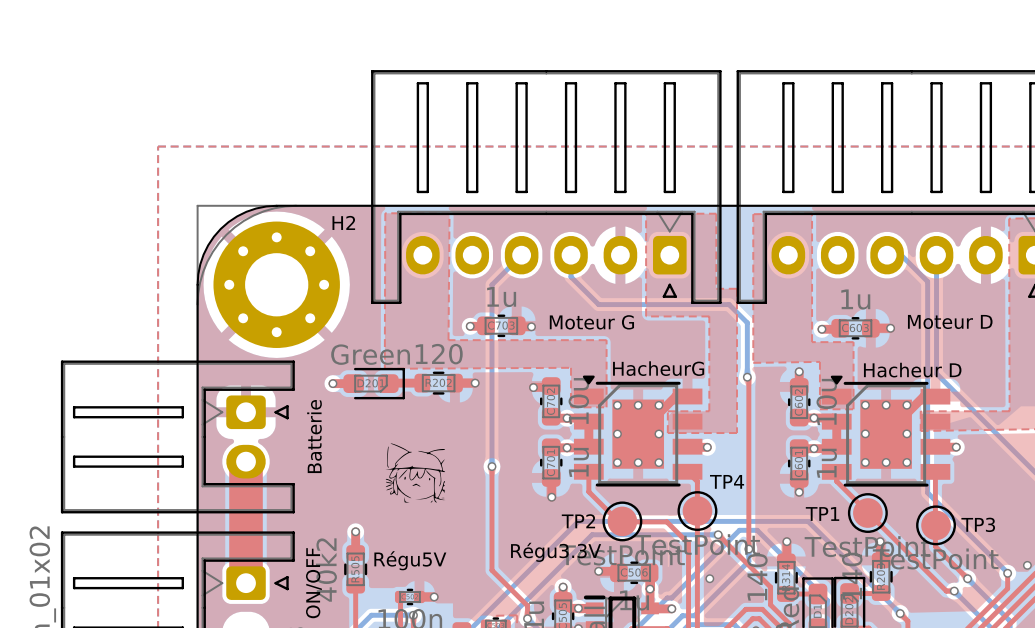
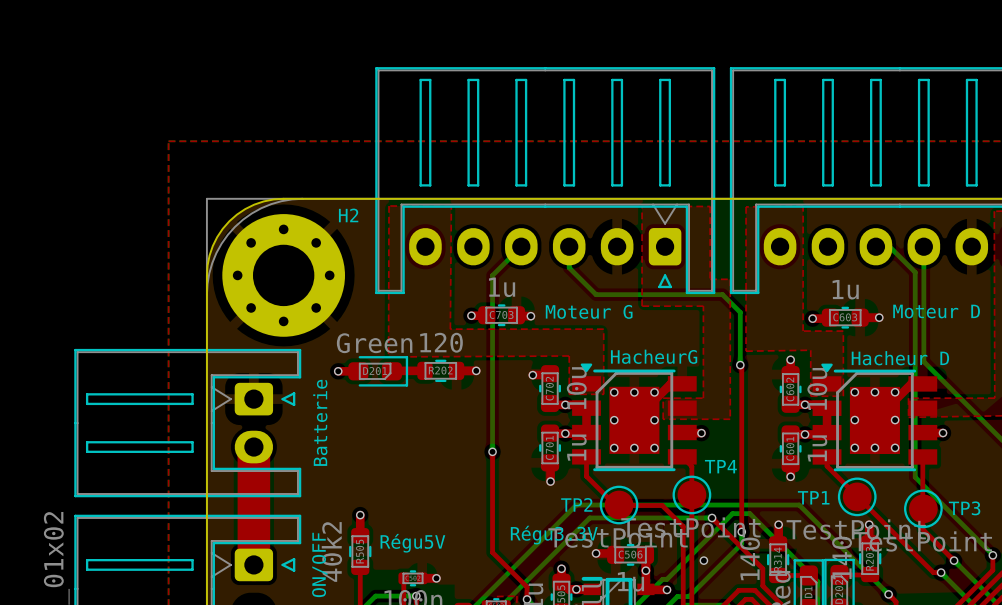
drawing: [385, 443, 446, 503] -> none

